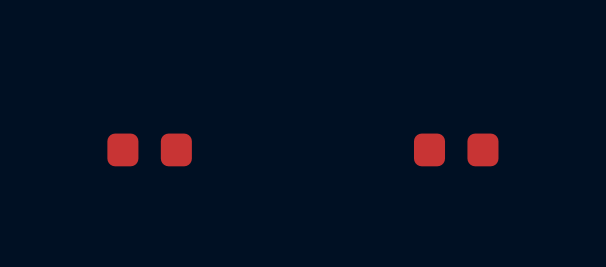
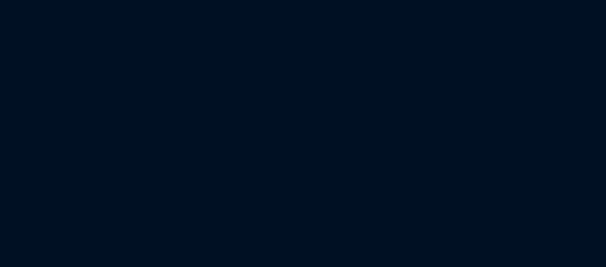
part: (149, 149) -> none
part: (456, 149) -> none

